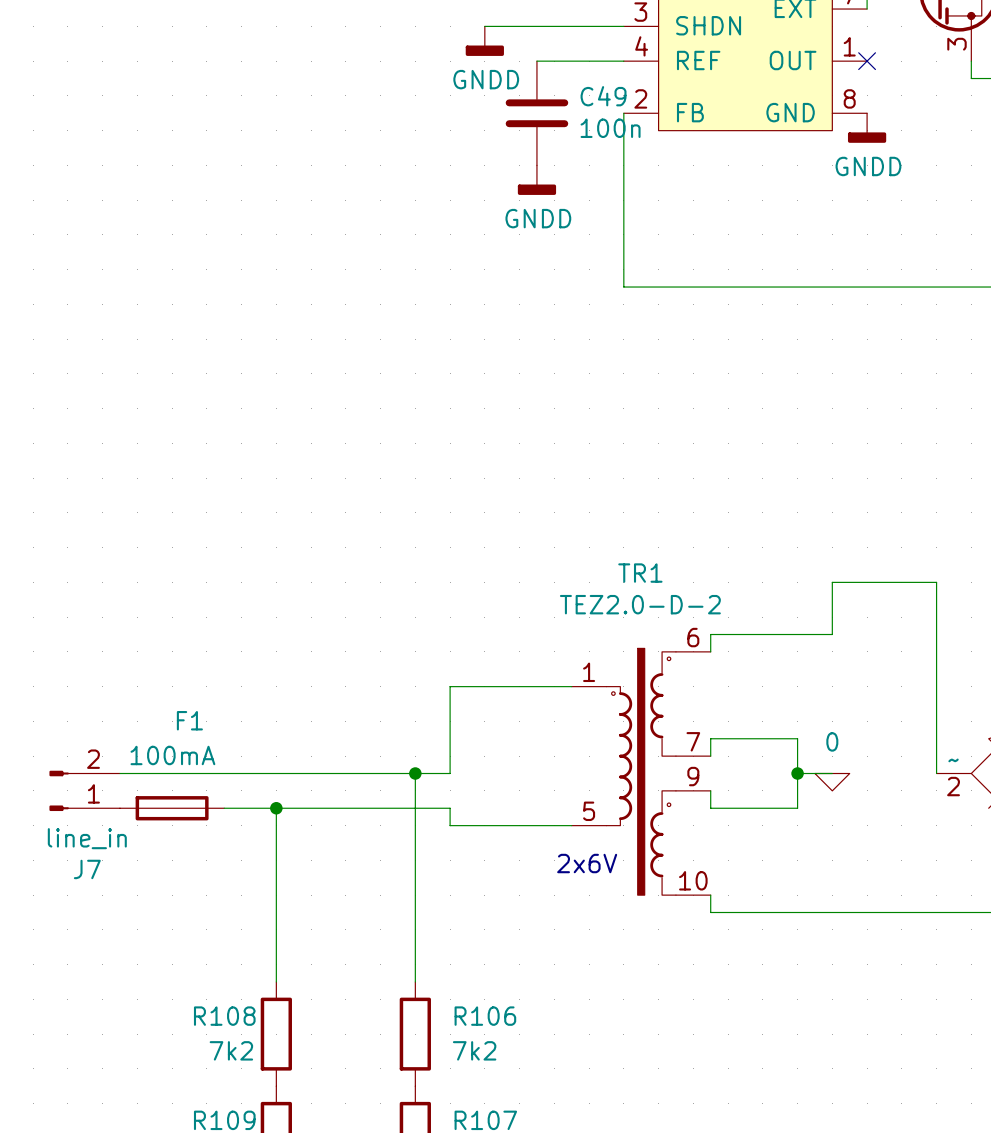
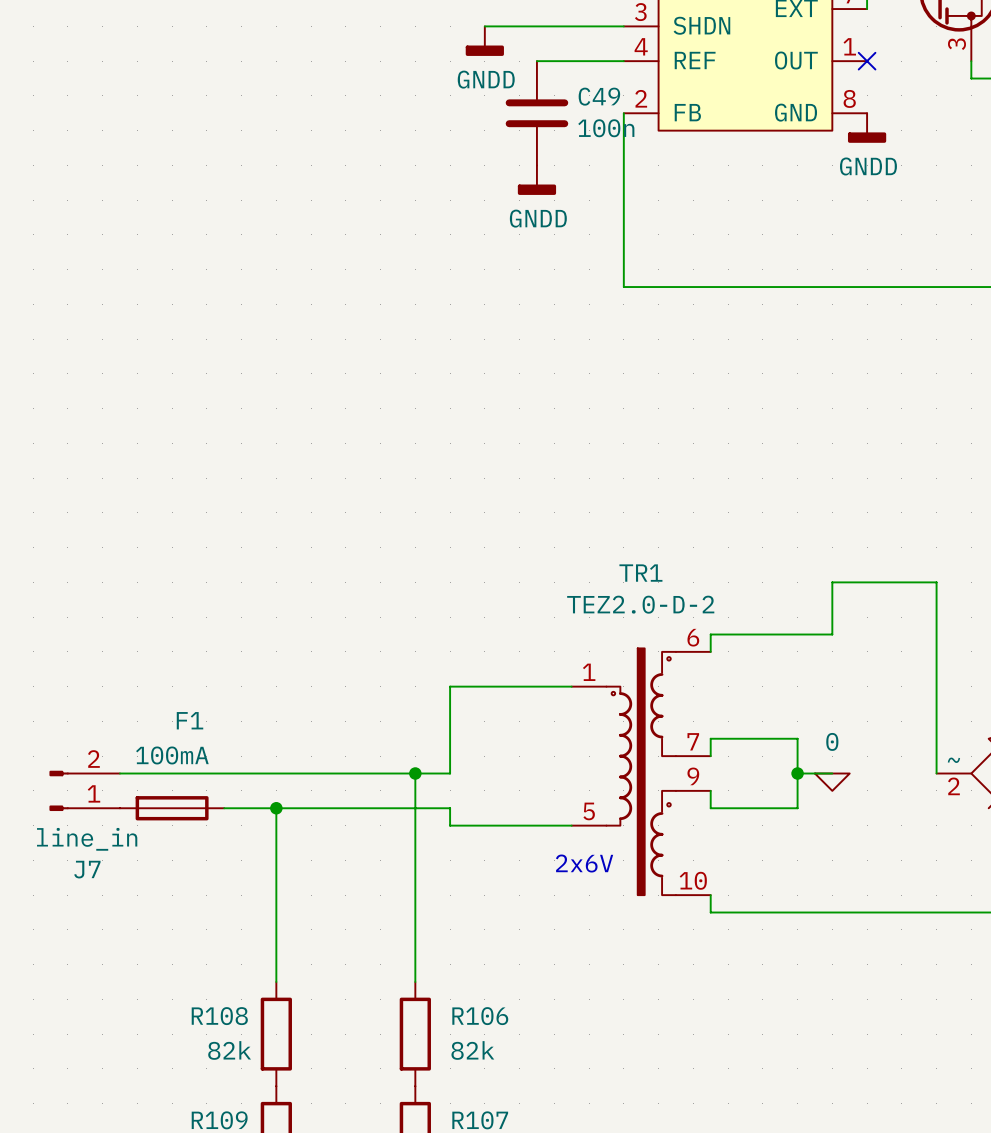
R108 value: 7k2 (231, 1050) -> 82k (229, 1050)
R106 value: 7k2 (474, 1050) -> 82k (472, 1050)

